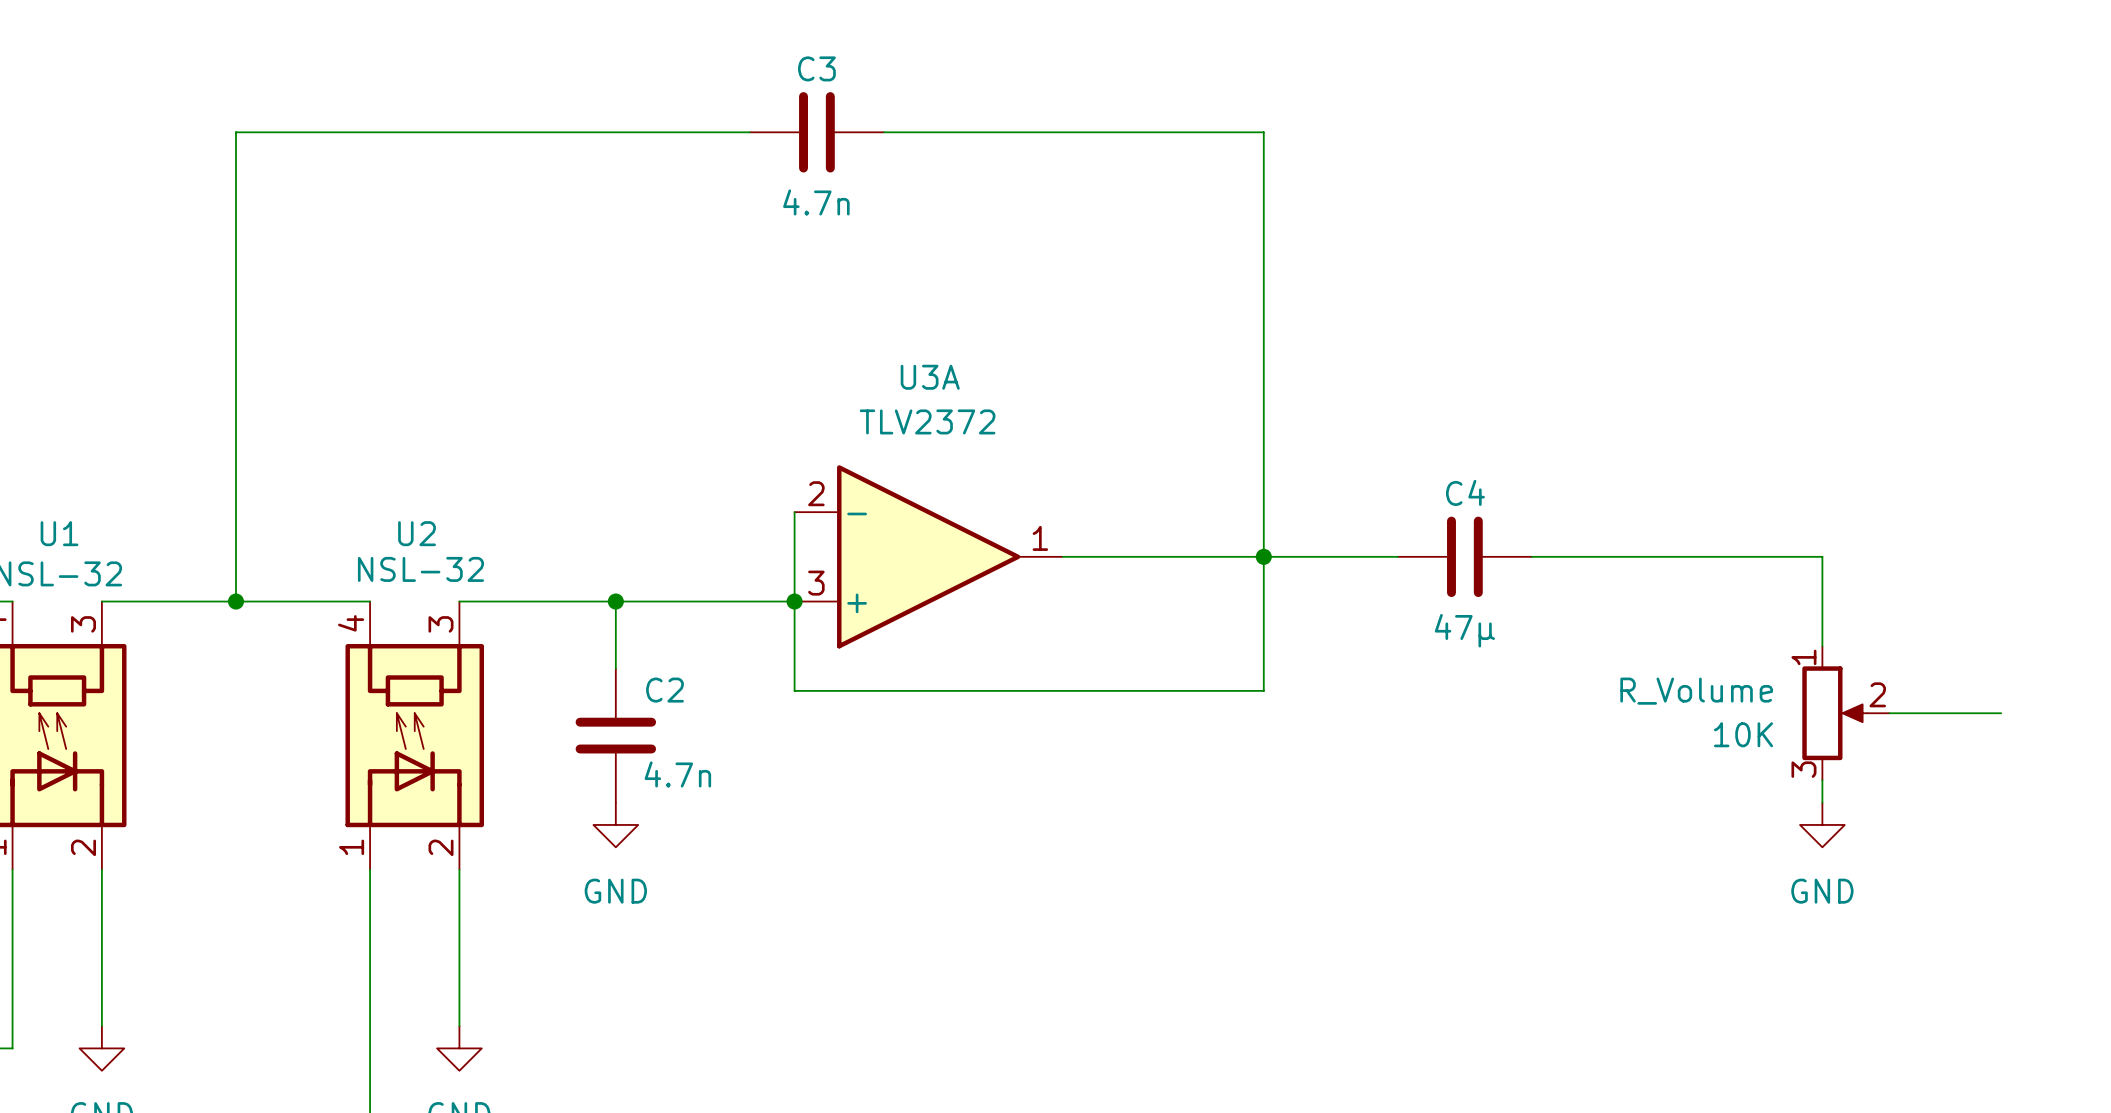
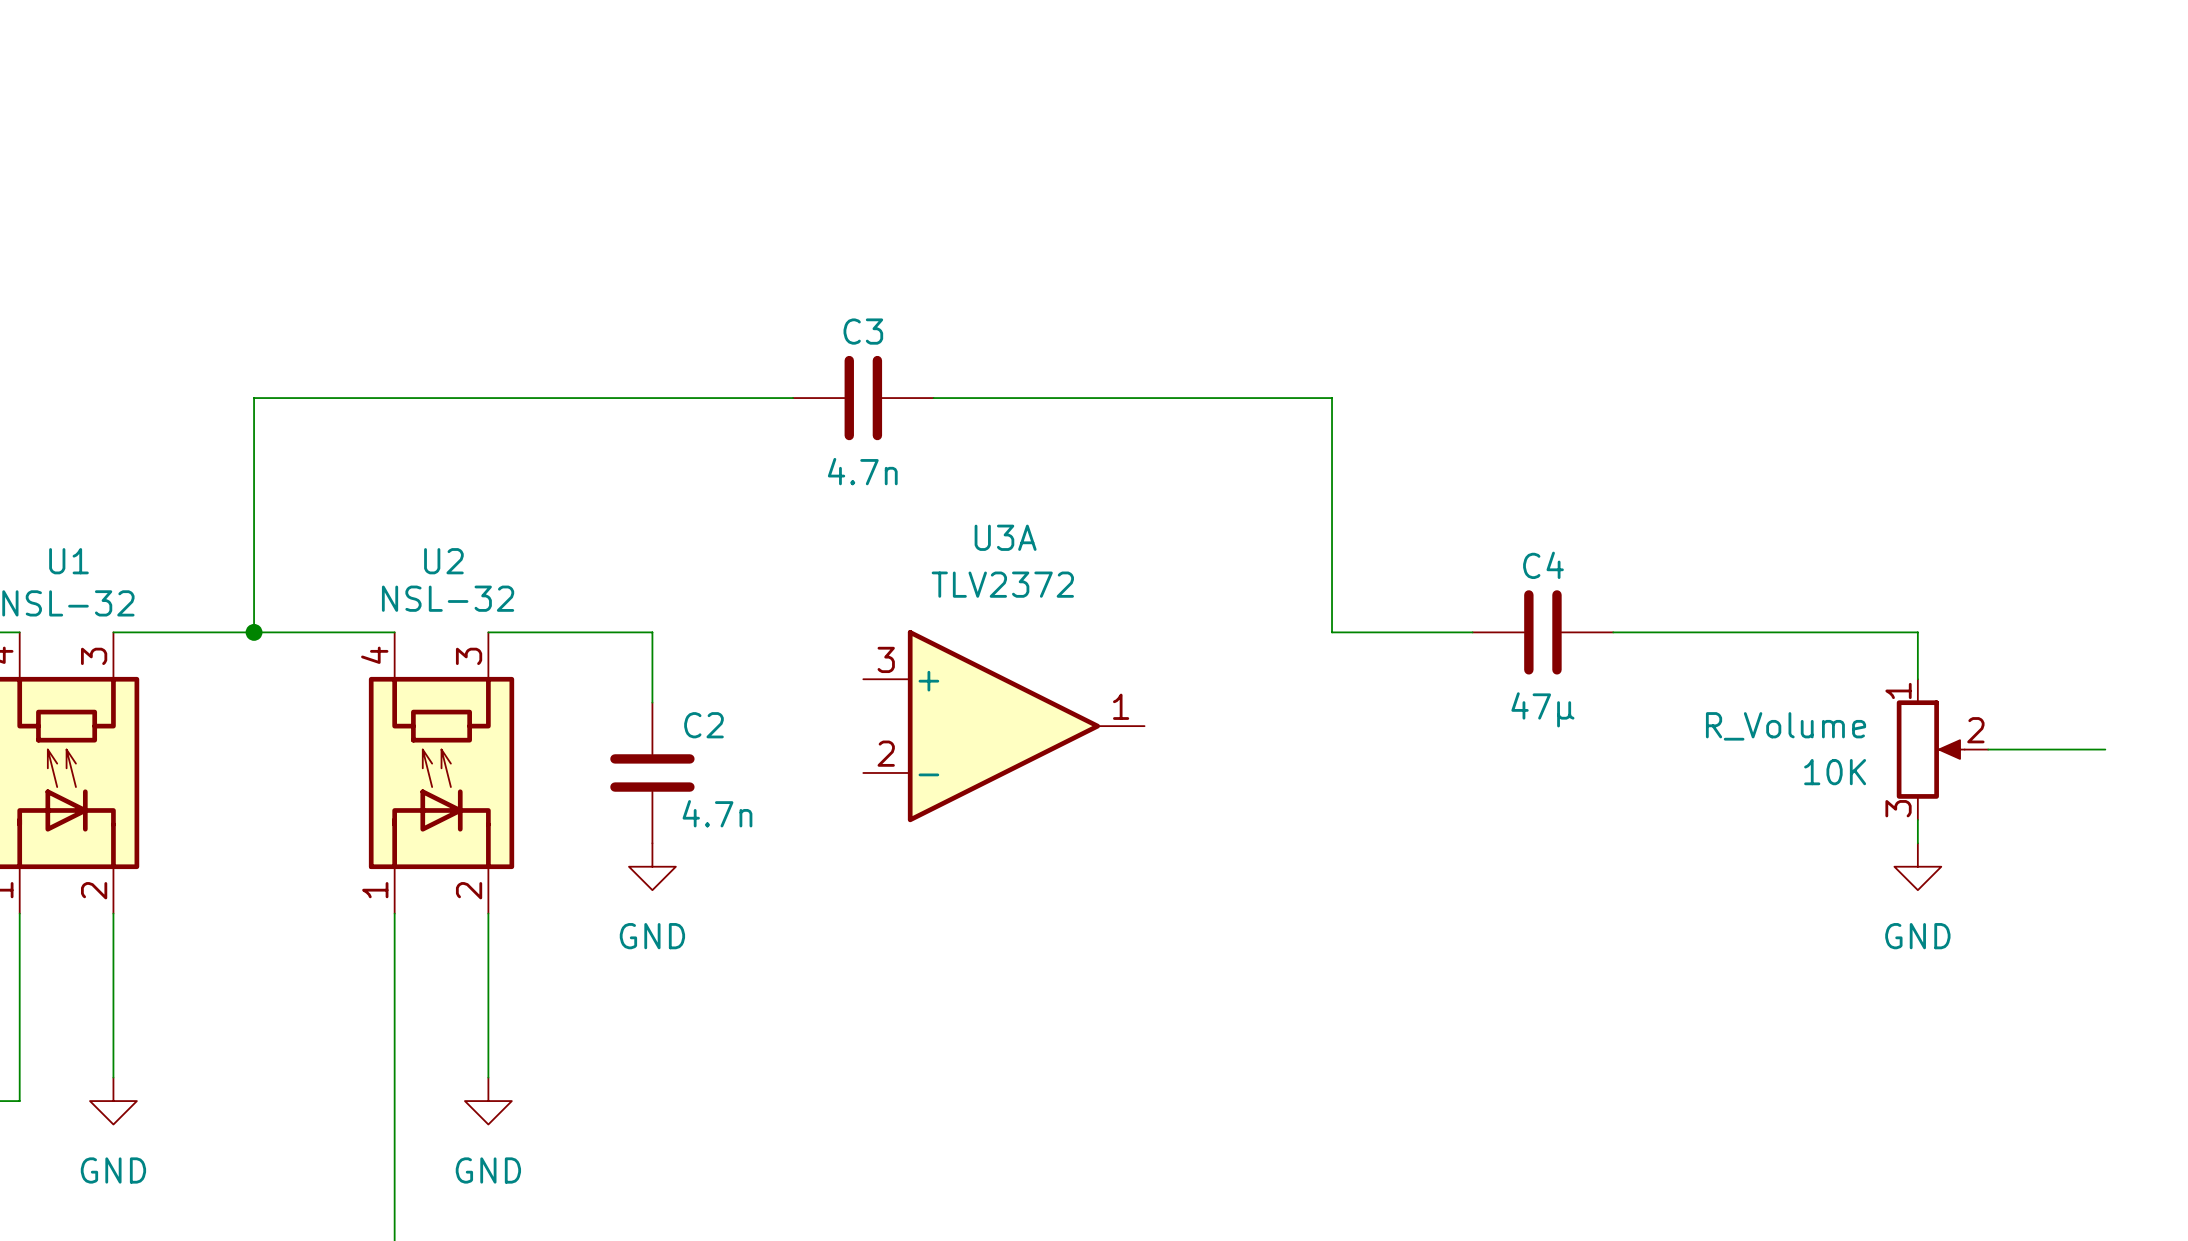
wire: (749, 132) (235, 132) (235, 378) -> (793, 398) (254, 398)
C3 position: (816, 132) -> (863, 398)
wire: (883, 132) (1263, 132) (1263, 378) -> (933, 398) (1332, 398)
wire: (794, 512) (794, 690) (1263, 690) (1263, 601) -> (1472, 632) (1332, 632)
U3A flip: as is (928, 556) -> up-down (1003, 726)
wire: (1062, 556) (1397, 556) -> none
junction: (1263, 556) -> none
C4 position: (1464, 556) -> (1542, 632)
wire: (1531, 556) (1822, 556) (1822, 601) -> (1613, 632) (1917, 632)
wire: (615, 601) (794, 601) -> none
junction: (615, 601) -> none
junction: (794, 601) -> none

